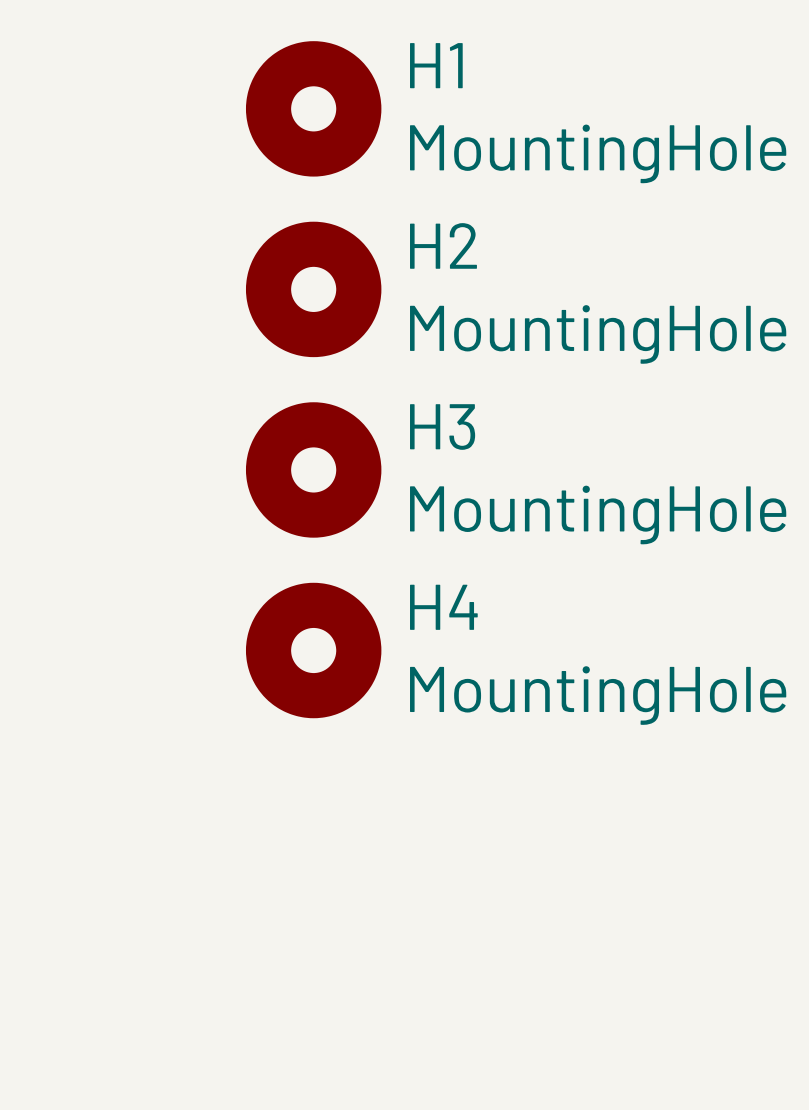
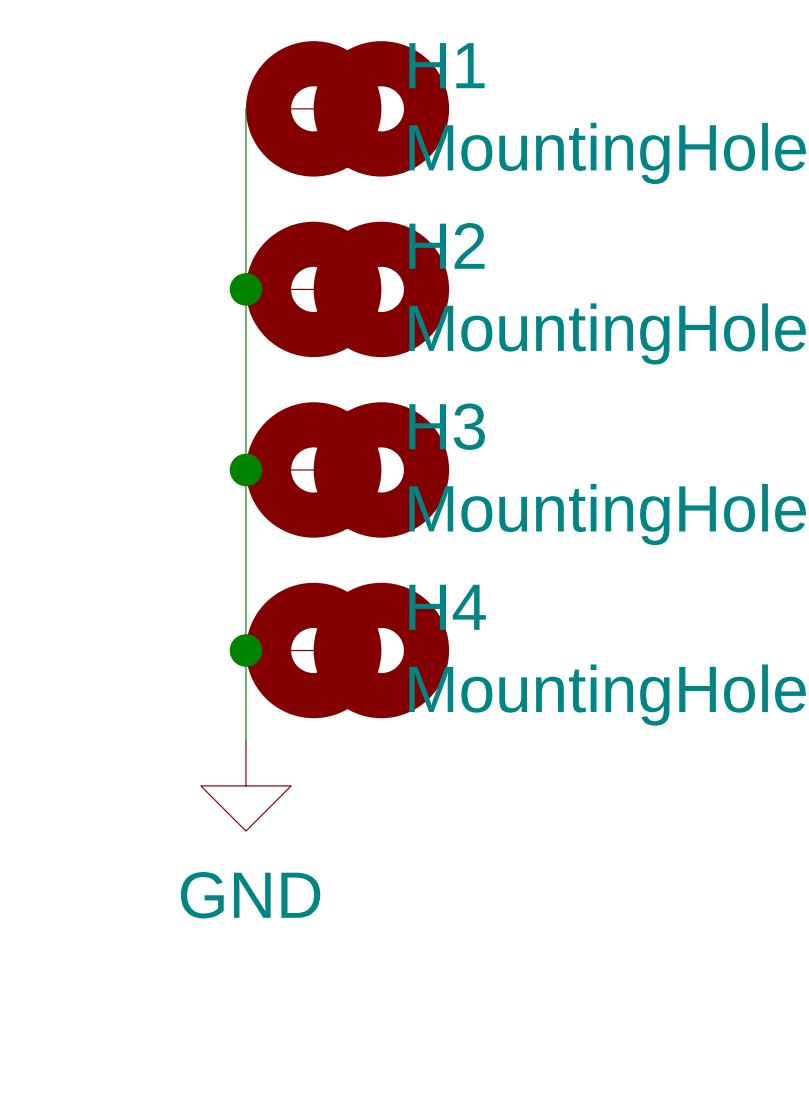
wire: none -> (245, 108) (245, 740)
part: none -> (347, 108)
junction: none -> (245, 289)
part: none -> (347, 289)
junction: none -> (245, 469)
part: none -> (347, 469)
junction: none -> (245, 650)
part: none -> (347, 650)
power symbol: none -> GND (245, 785)

